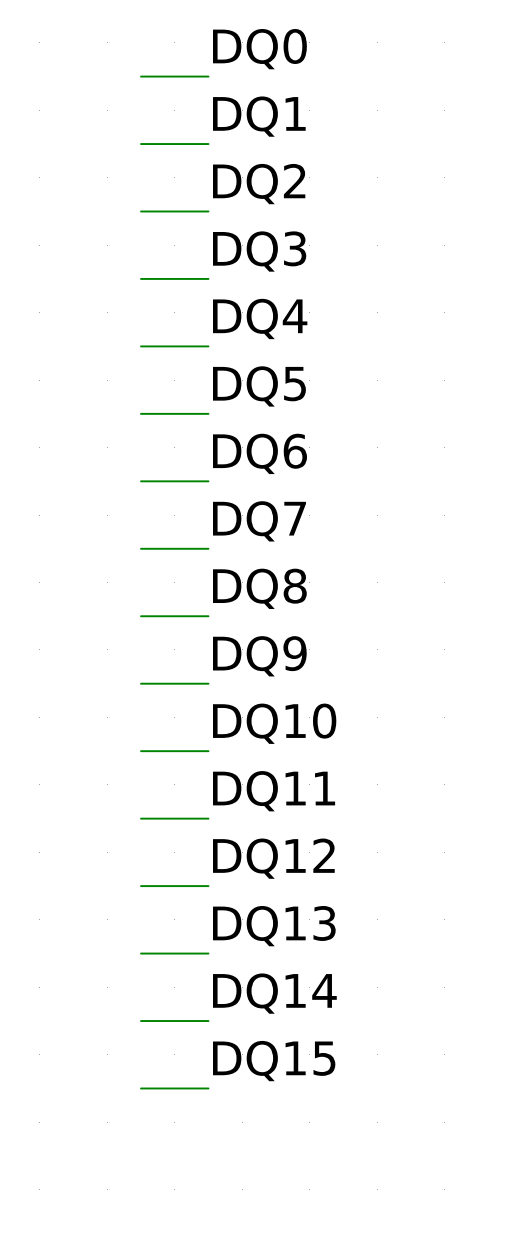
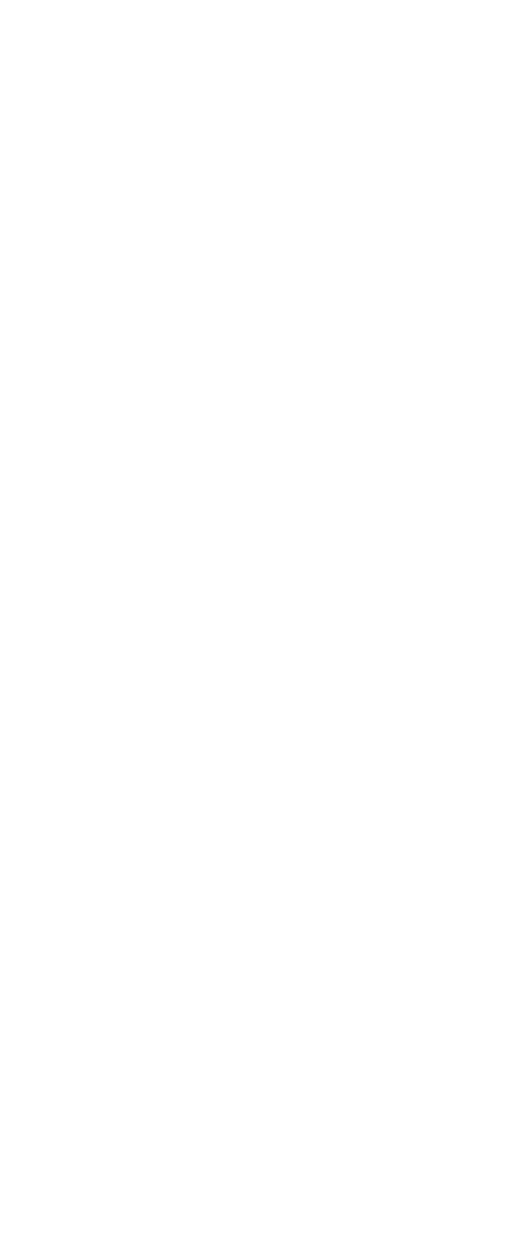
label: DQ0 (259, 49) -> none
wire: (141, 76) (208, 76) -> none
label: DQ1 (259, 116) -> none
wire: (141, 144) (208, 144) -> none
label: DQ2 (259, 184) -> none
wire: (141, 211) (208, 211) -> none
label: DQ3 (259, 251) -> none
wire: (141, 278) (208, 278) -> none
label: DQ4 (260, 318) -> none
wire: (141, 346) (208, 346) -> none
label: DQ5 (259, 386) -> none
wire: (141, 413) (208, 413) -> none
label: DQ6 (260, 453) -> none
wire: (141, 481) (208, 481) -> none
label: DQ7 (259, 521) -> none
wire: (141, 548) (208, 548) -> none
label: DQ8 (259, 588) -> none
wire: (141, 616) (208, 616) -> none
label: DQ9 (259, 656) -> none
wire: (141, 683) (208, 683) -> none
label: DQ10 (274, 723) -> none
wire: (141, 751) (208, 751) -> none
label: DQ11 (274, 791) -> none
wire: (141, 818) (208, 818) -> none
label: DQ12 (273, 858) -> none
wire: (141, 886) (208, 886) -> none
label: DQ13 (274, 926) -> none
wire: (141, 953) (208, 953) -> none
label: DQ14 (274, 993) -> none
wire: (141, 1021) (208, 1021) -> none
label: DQ15 (274, 1061) -> none
wire: (141, 1088) (208, 1088) -> none

